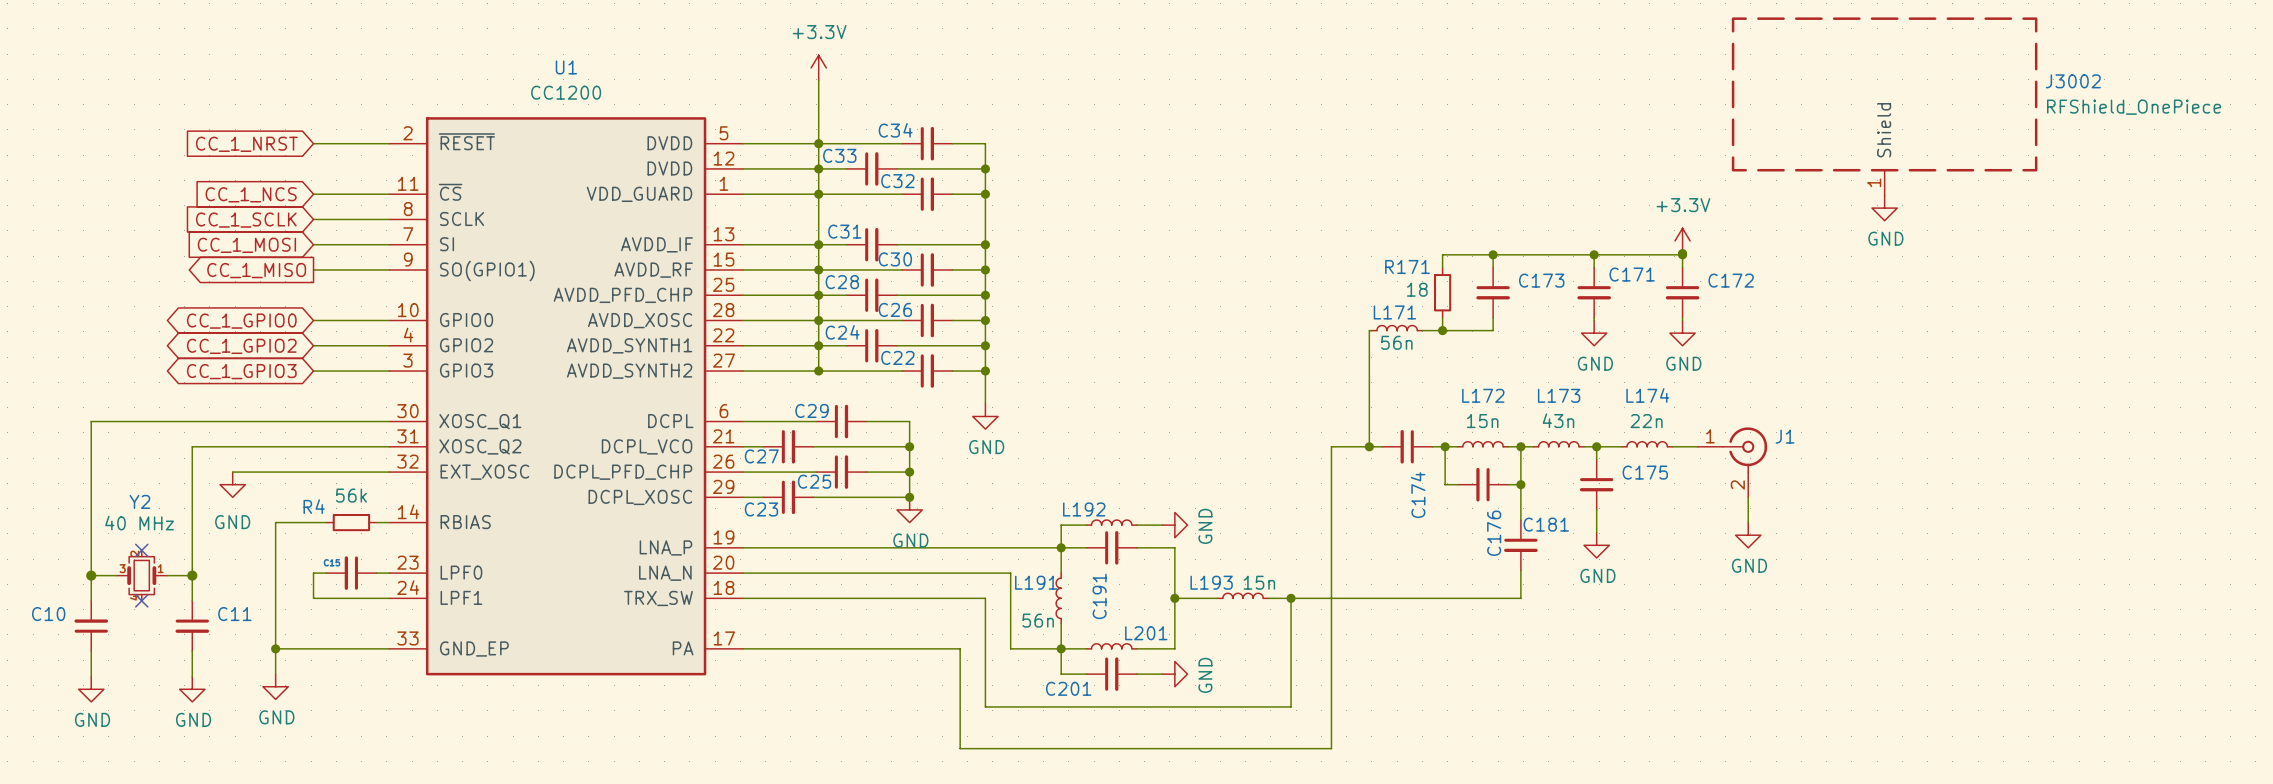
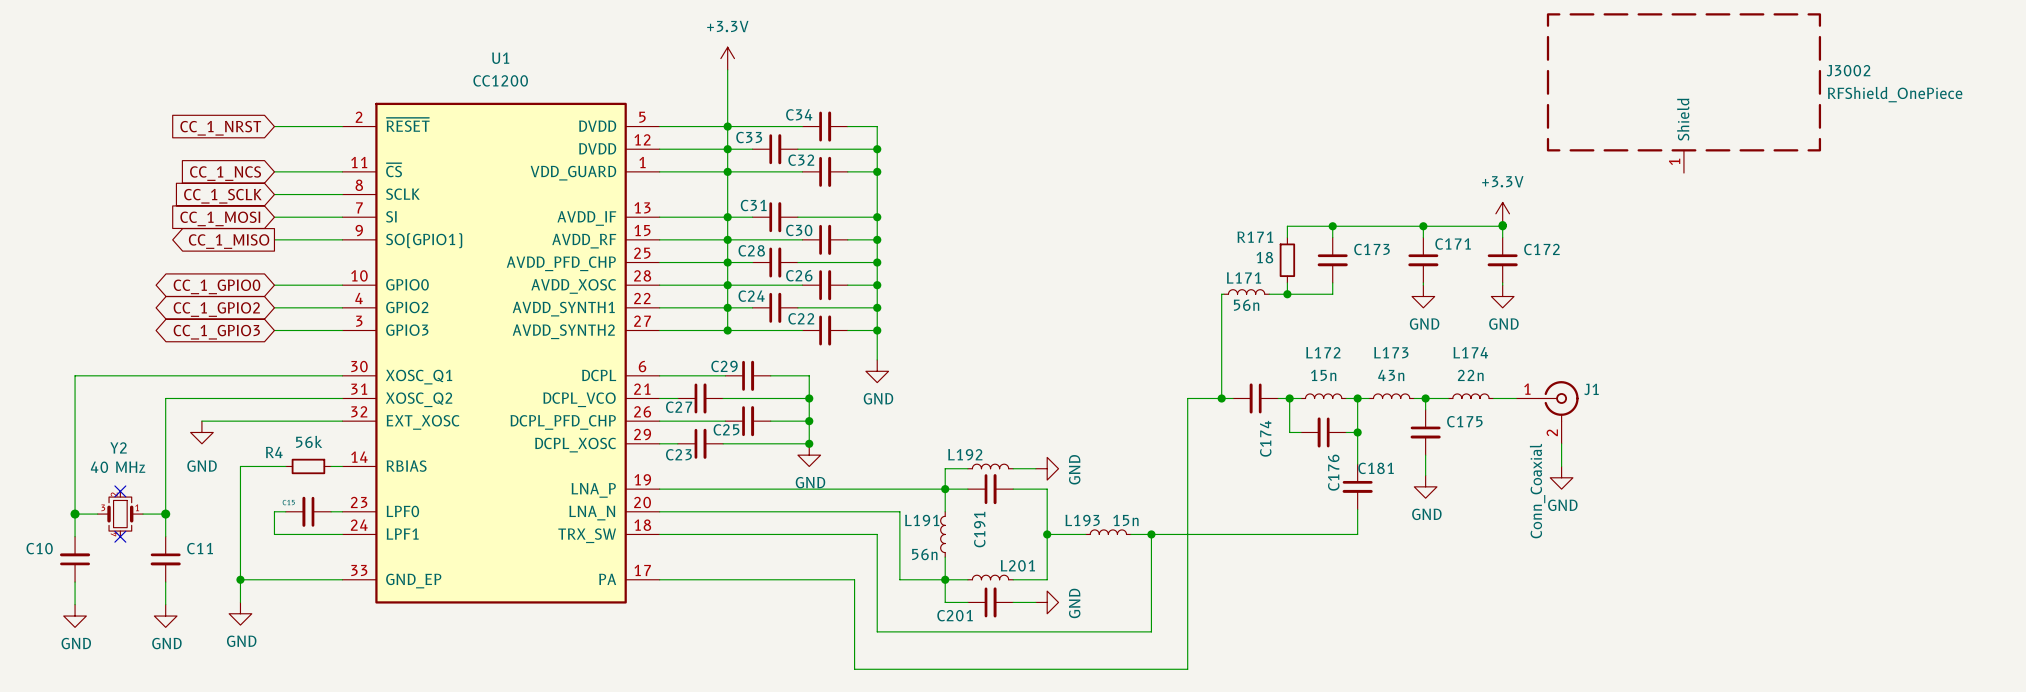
power symbol: GND (1884, 208) -> none
J1 value: none -> Conn_Coaxial (1537, 491)

